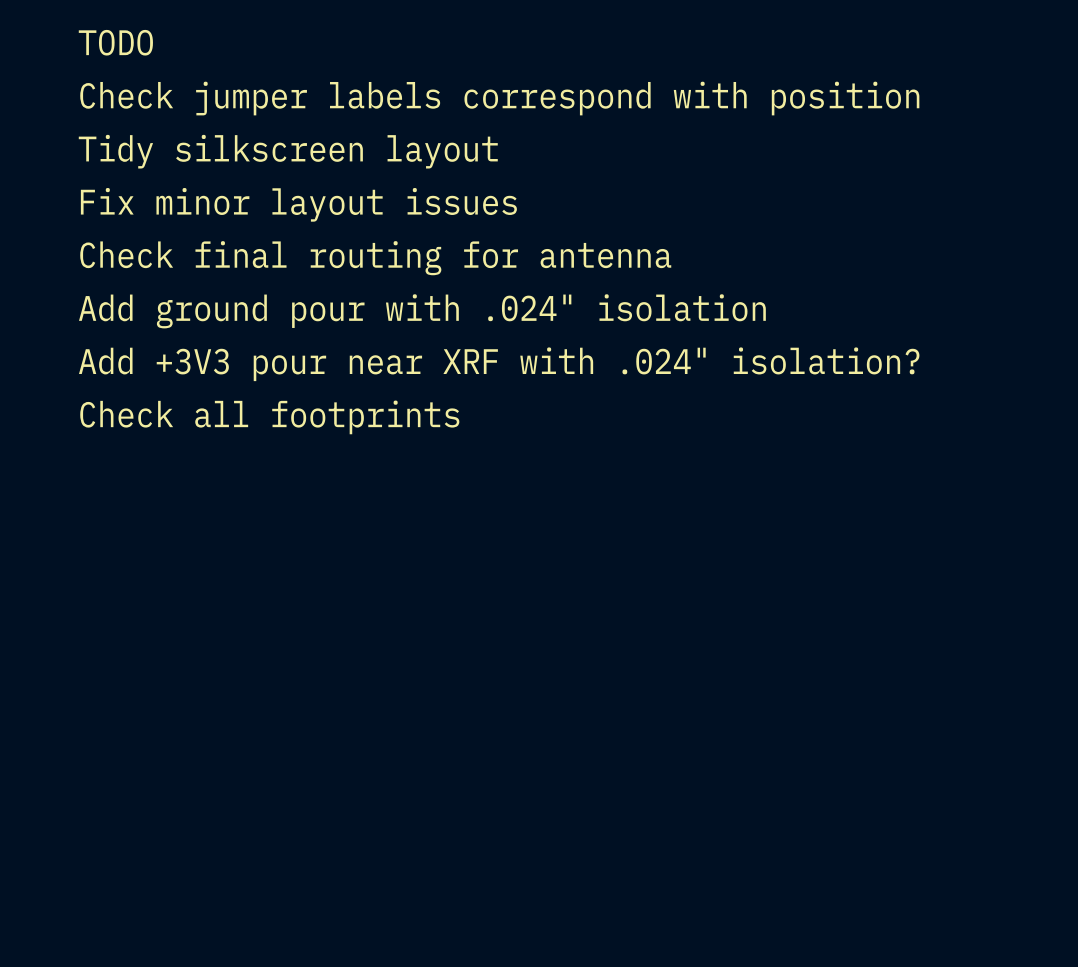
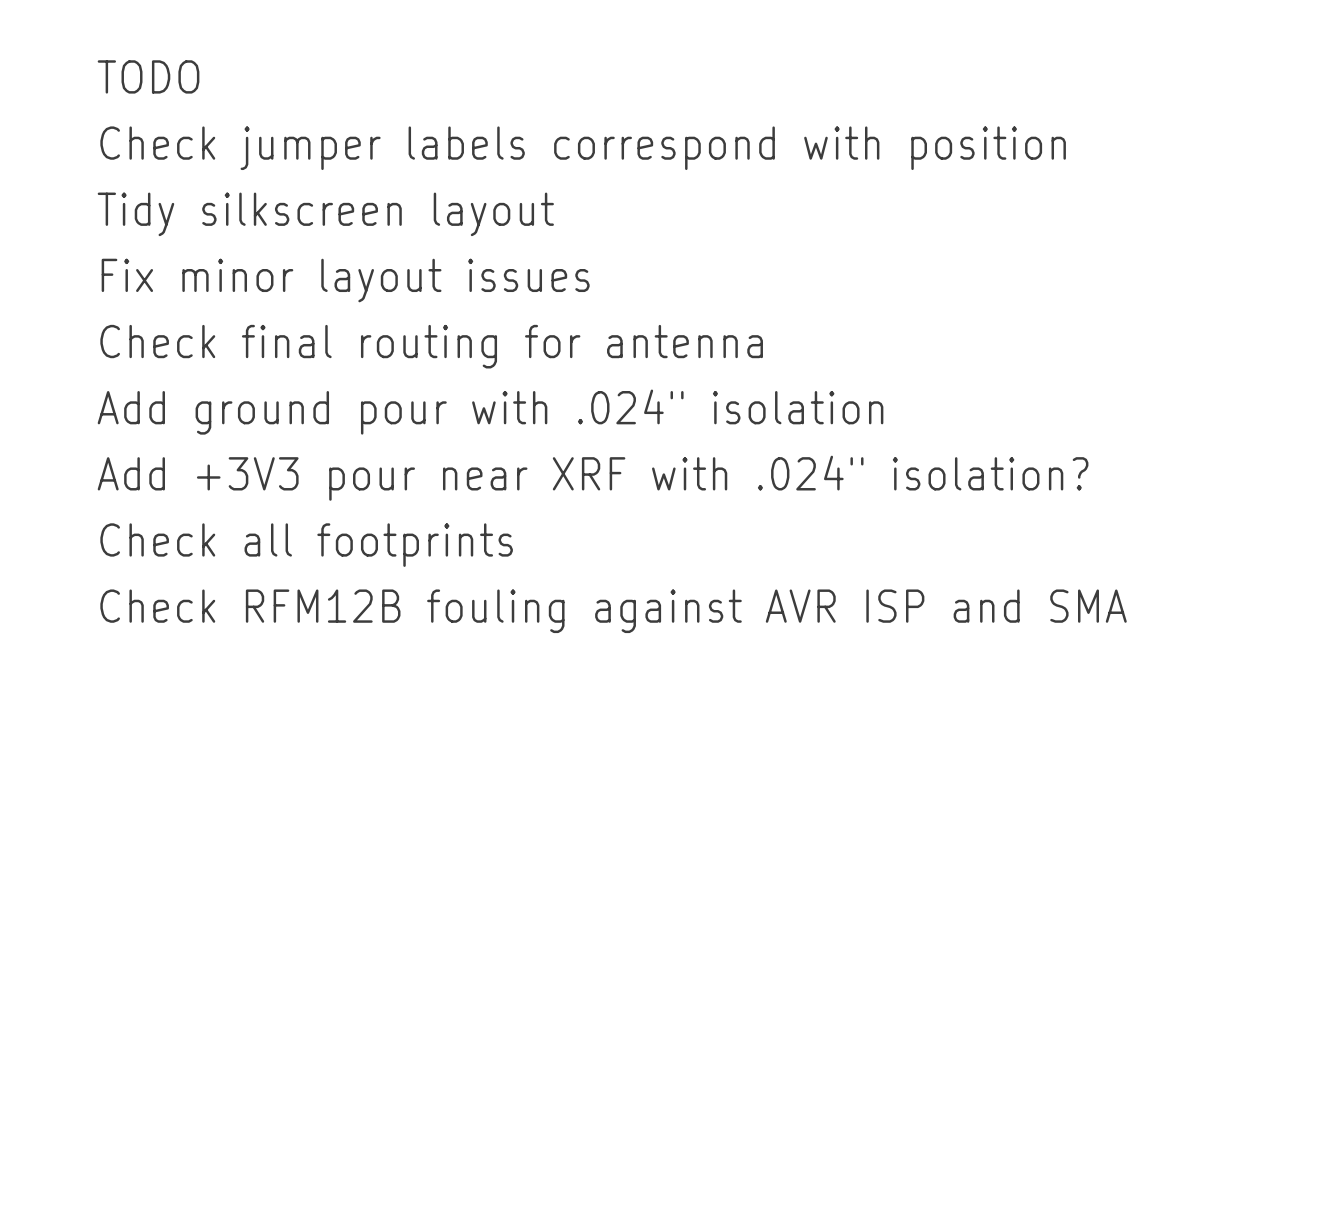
text: none -> Check RFM12B fouling against AVR ISP and SMA (613, 611)

